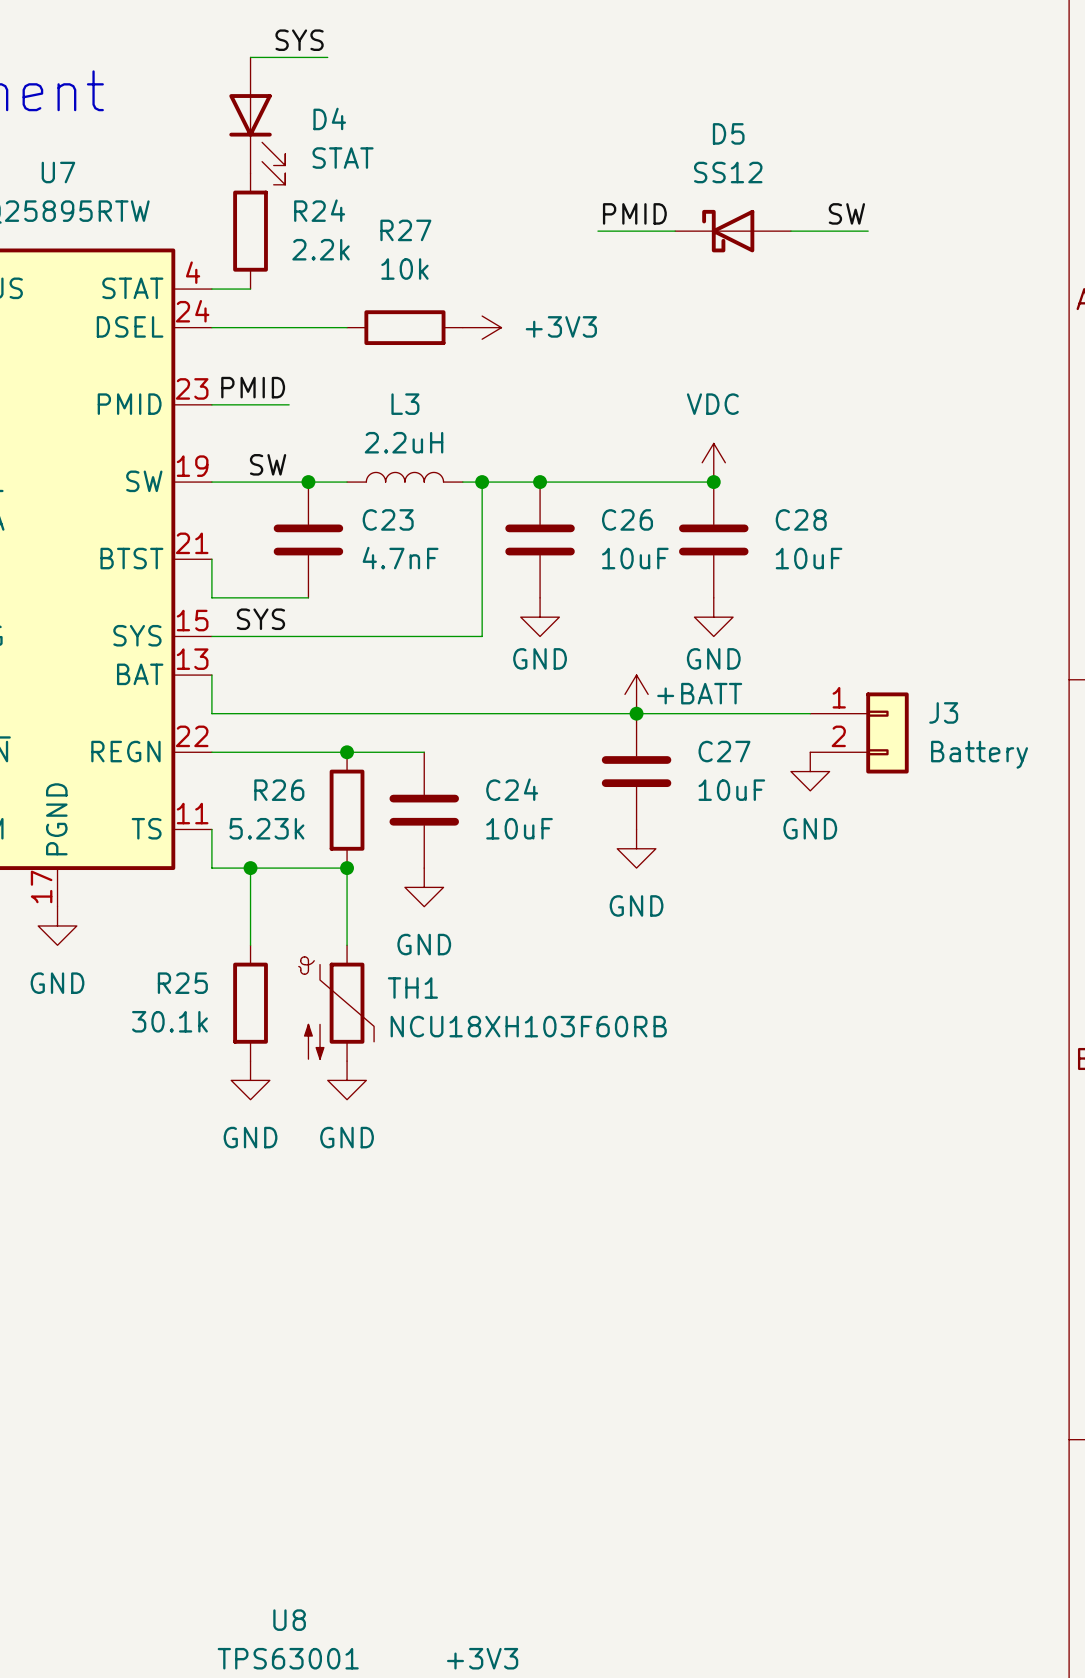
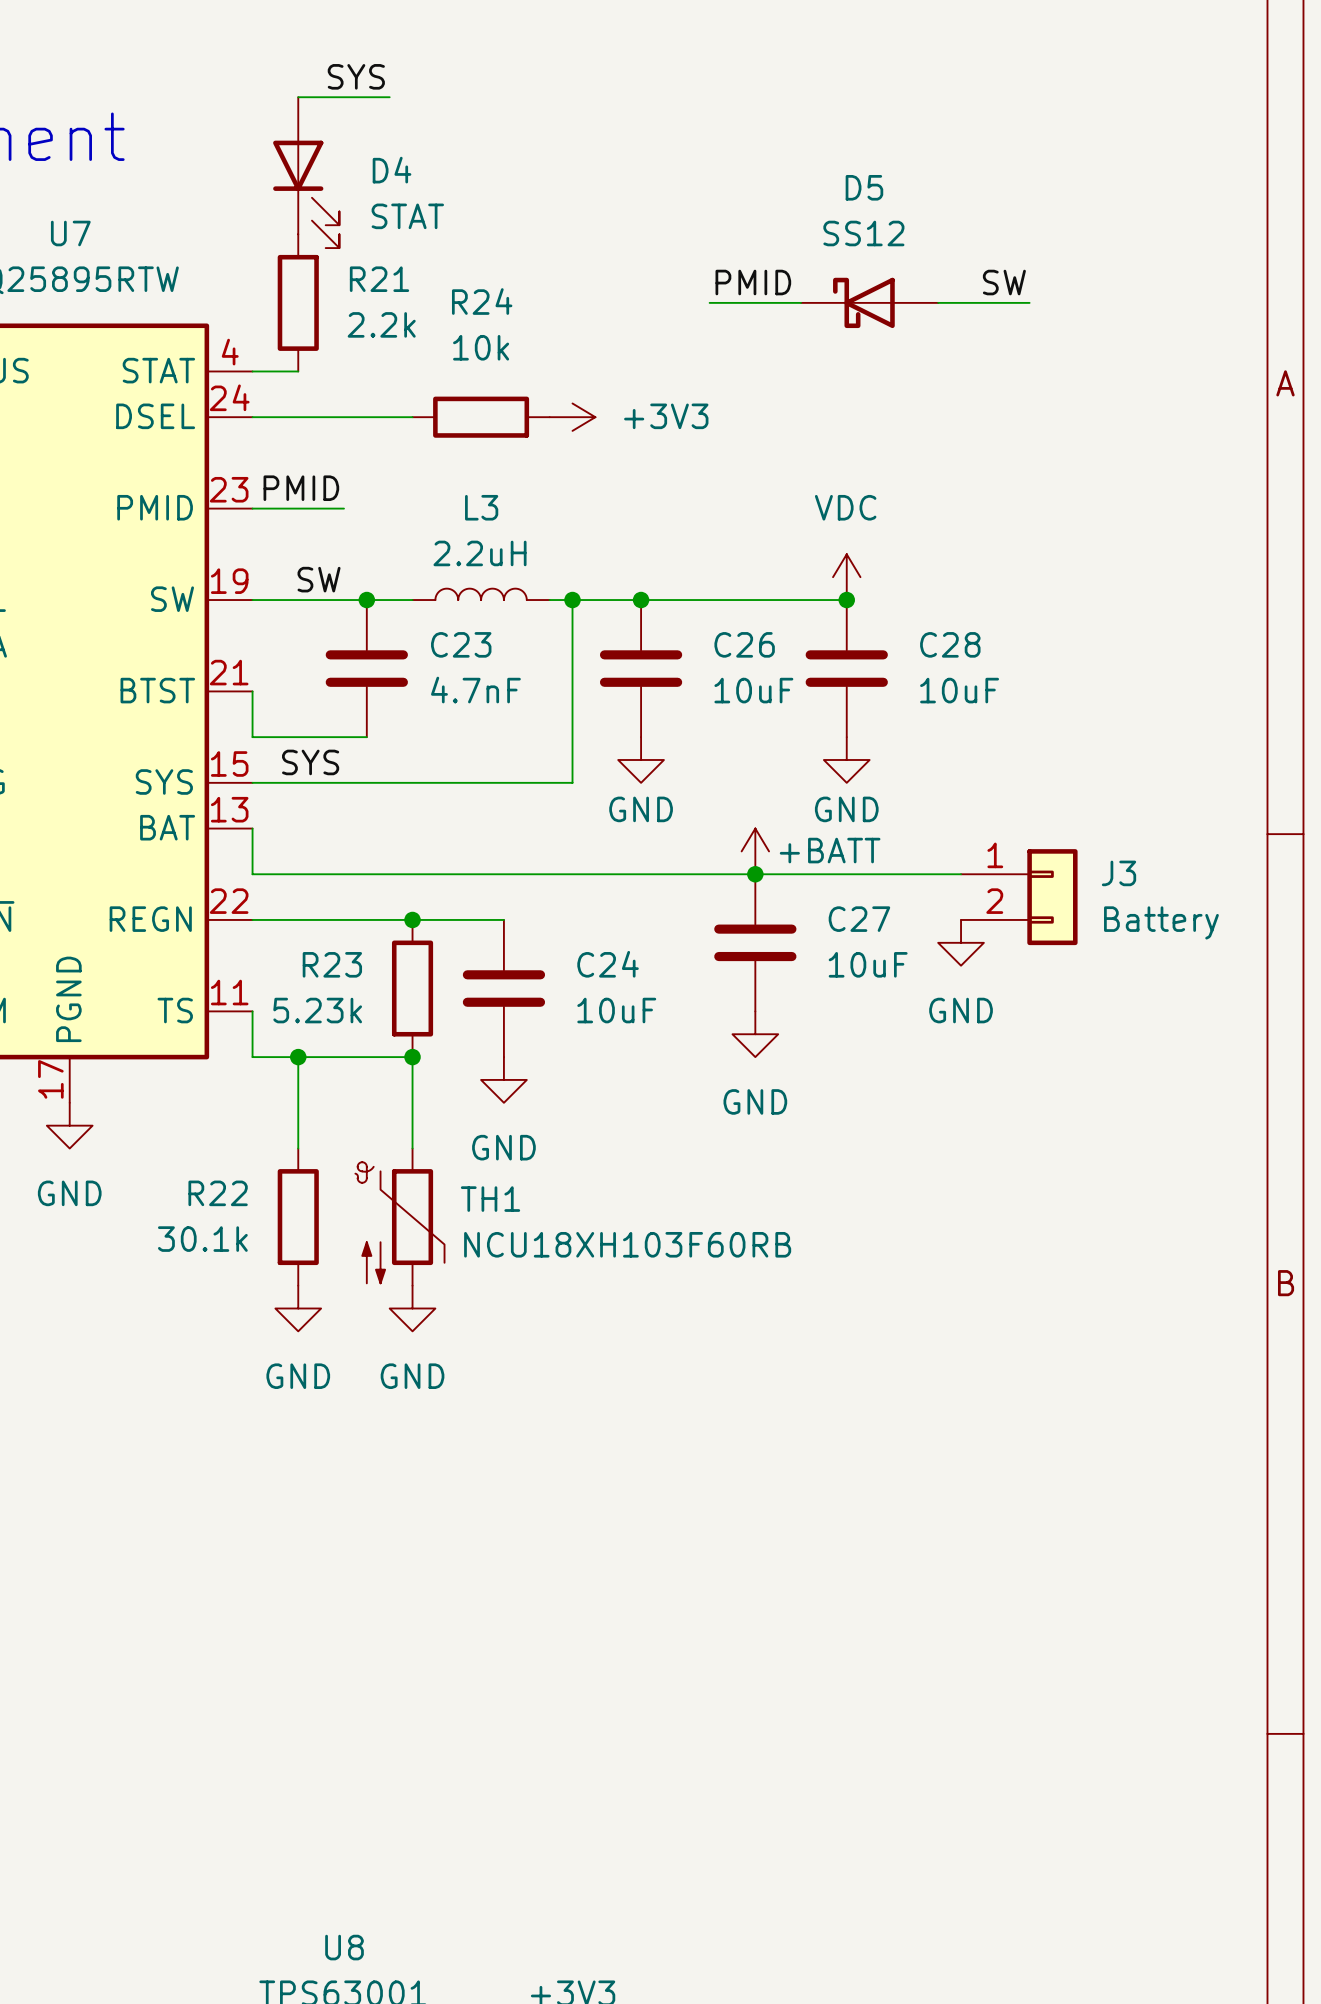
R24 name: R24 (319, 210) -> R21 (379, 279)
R27 name: R27 (405, 230) -> R24 (482, 301)
R26 name: R26 (279, 790) -> R23 (332, 964)
R25 name: R25 (182, 983) -> R22 (218, 1193)

